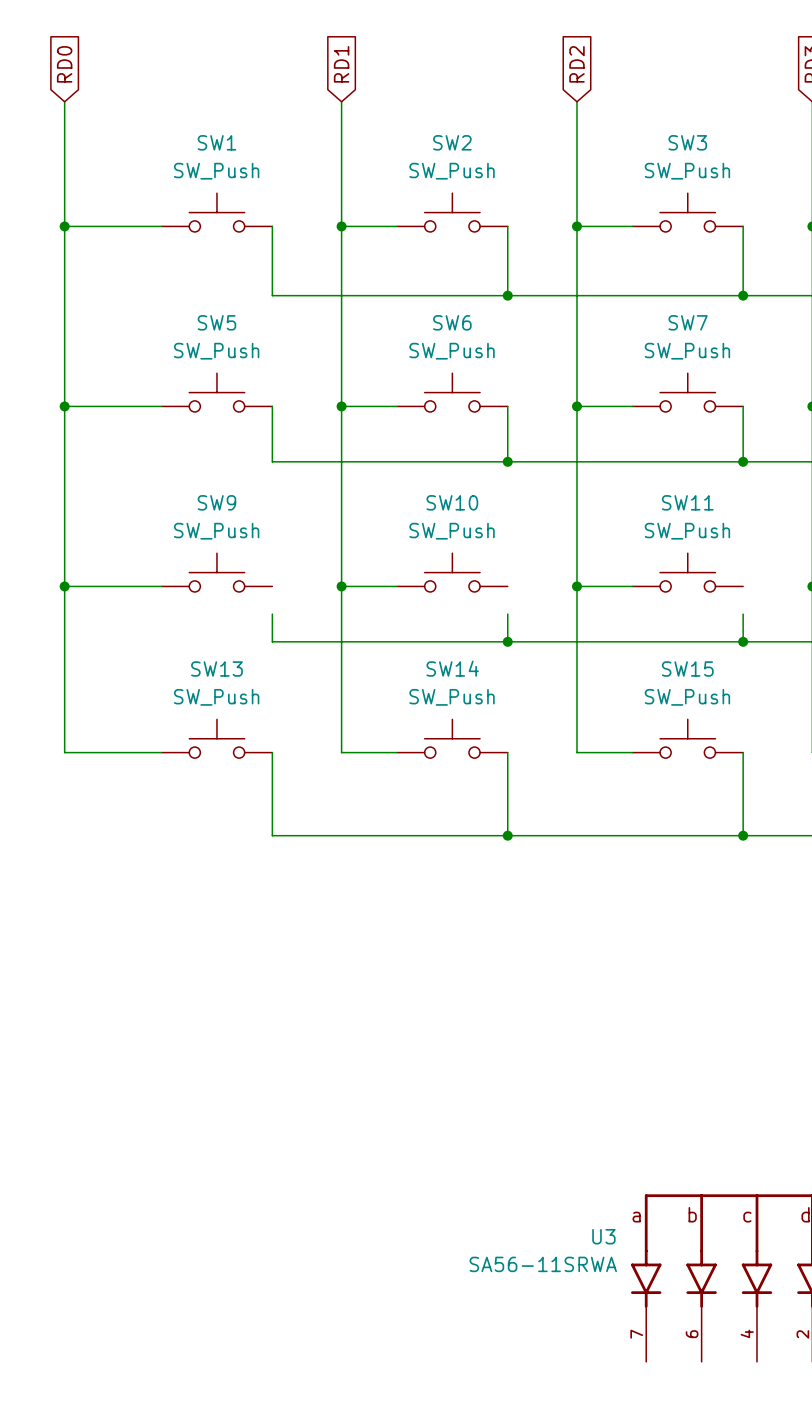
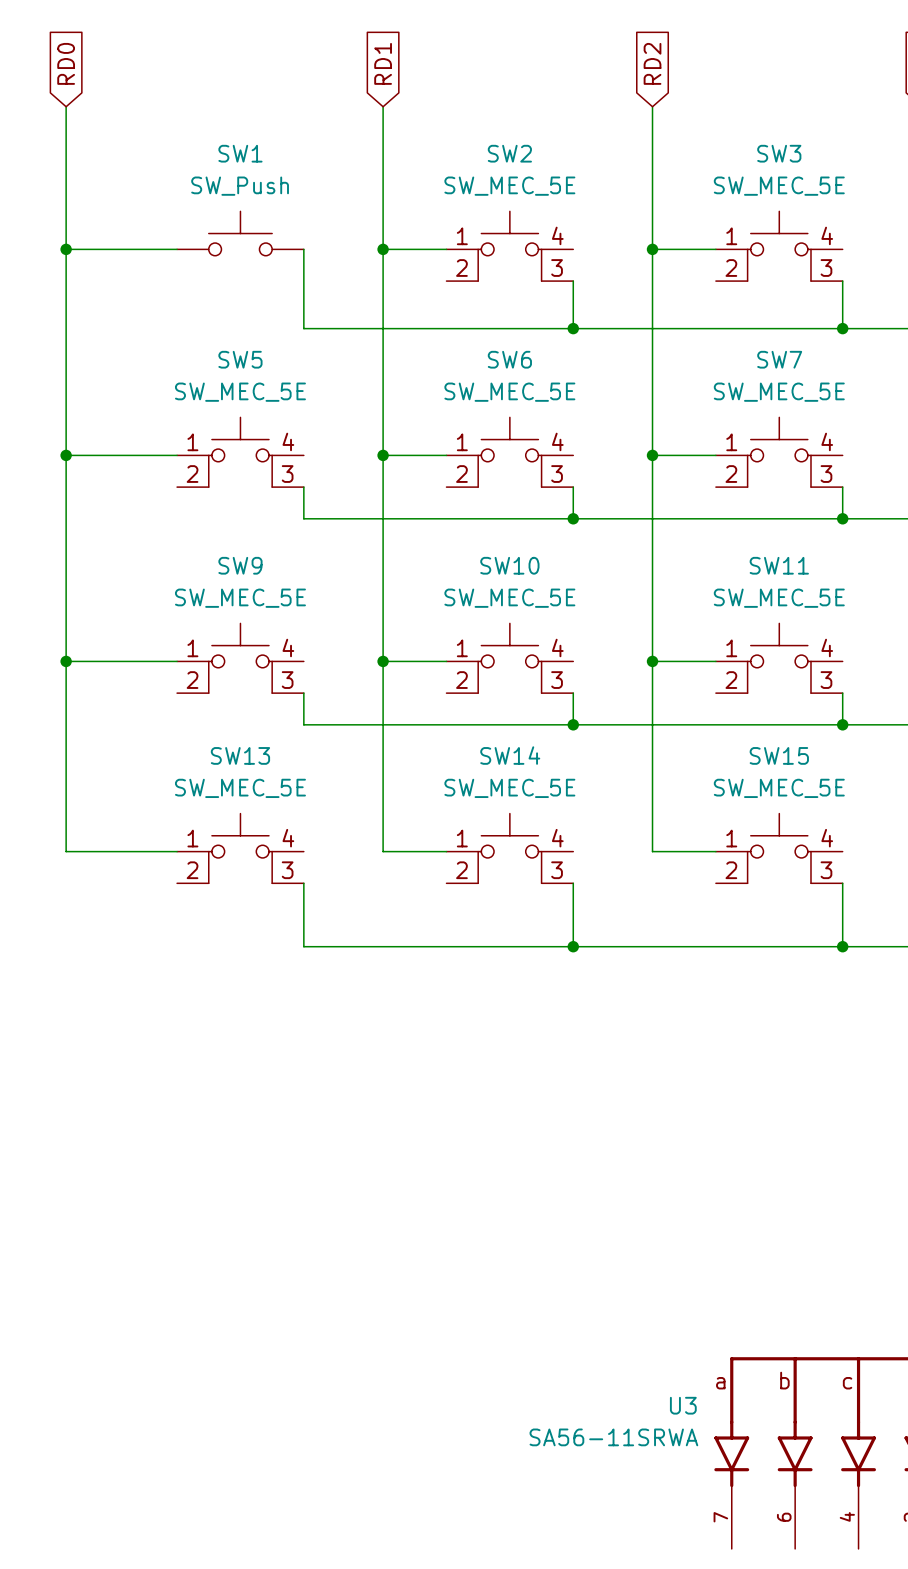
SW2 value: SW_Push (452, 171) -> SW_MEC_5E (509, 186)
SW3 value: SW_Push (687, 171) -> SW_MEC_5E (779, 186)
SW2 symbol: [396, 193, 508, 232] -> [446, 211, 574, 282]
SW3 symbol: [632, 193, 744, 232] -> [715, 211, 843, 282]
wire: (507, 226) (507, 254) -> none
wire: (743, 226) (743, 254) -> none
SW5 value: SW_Push (216, 351) -> SW_MEC_5E (240, 392)
SW6 value: SW_Push (452, 351) -> SW_MEC_5E (509, 392)
SW7 value: SW_Push (687, 351) -> SW_MEC_5E (779, 392)
SW5 symbol: [161, 373, 273, 412] -> [177, 417, 304, 488]
SW6 symbol: [396, 373, 508, 412] -> [446, 417, 574, 488]
SW7 symbol: [632, 373, 744, 412] -> [715, 417, 843, 488]
wire: (272, 406) (272, 434) -> none
wire: (507, 406) (507, 434) -> none
wire: (743, 406) (743, 434) -> none
SW9 value: SW_Push (216, 531) -> SW_MEC_5E (240, 598)
SW10 value: SW_Push (452, 531) -> SW_MEC_5E (509, 598)
SW11 value: SW_Push (687, 531) -> SW_MEC_5E (779, 598)
SW9 symbol: [161, 553, 273, 592] -> [177, 623, 304, 694]
SW10 symbol: [396, 553, 508, 592] -> [446, 623, 574, 694]
SW11 symbol: [632, 553, 744, 592] -> [715, 623, 843, 694]
SW13 value: SW_Push (216, 697) -> SW_MEC_5E (240, 788)
SW14 value: SW_Push (452, 697) -> SW_MEC_5E (509, 788)
SW15 value: SW_Push (687, 697) -> SW_MEC_5E (779, 788)
SW13 symbol: [161, 719, 273, 759] -> [177, 813, 304, 884]
SW14 symbol: [396, 719, 508, 759] -> [446, 813, 574, 884]
SW15 symbol: [632, 719, 744, 759] -> [715, 813, 843, 884]
wire: (272, 752) (272, 780) -> none
wire: (507, 752) (507, 780) -> none
wire: (743, 752) (743, 780) -> none

